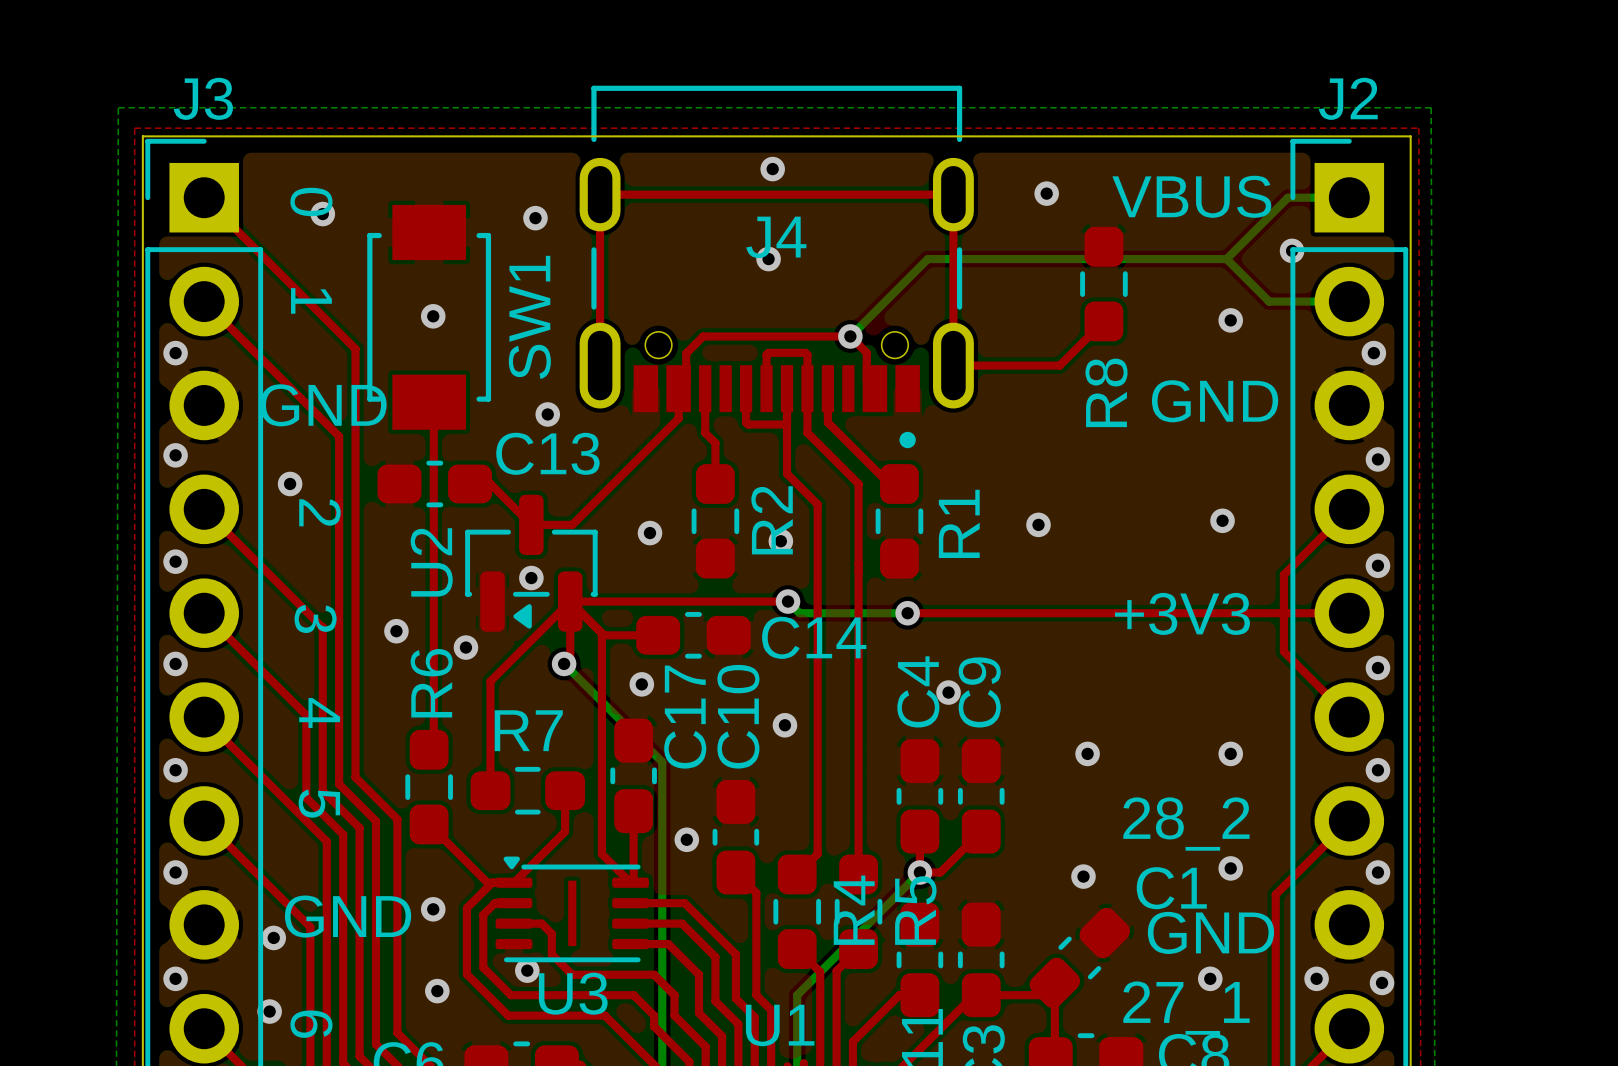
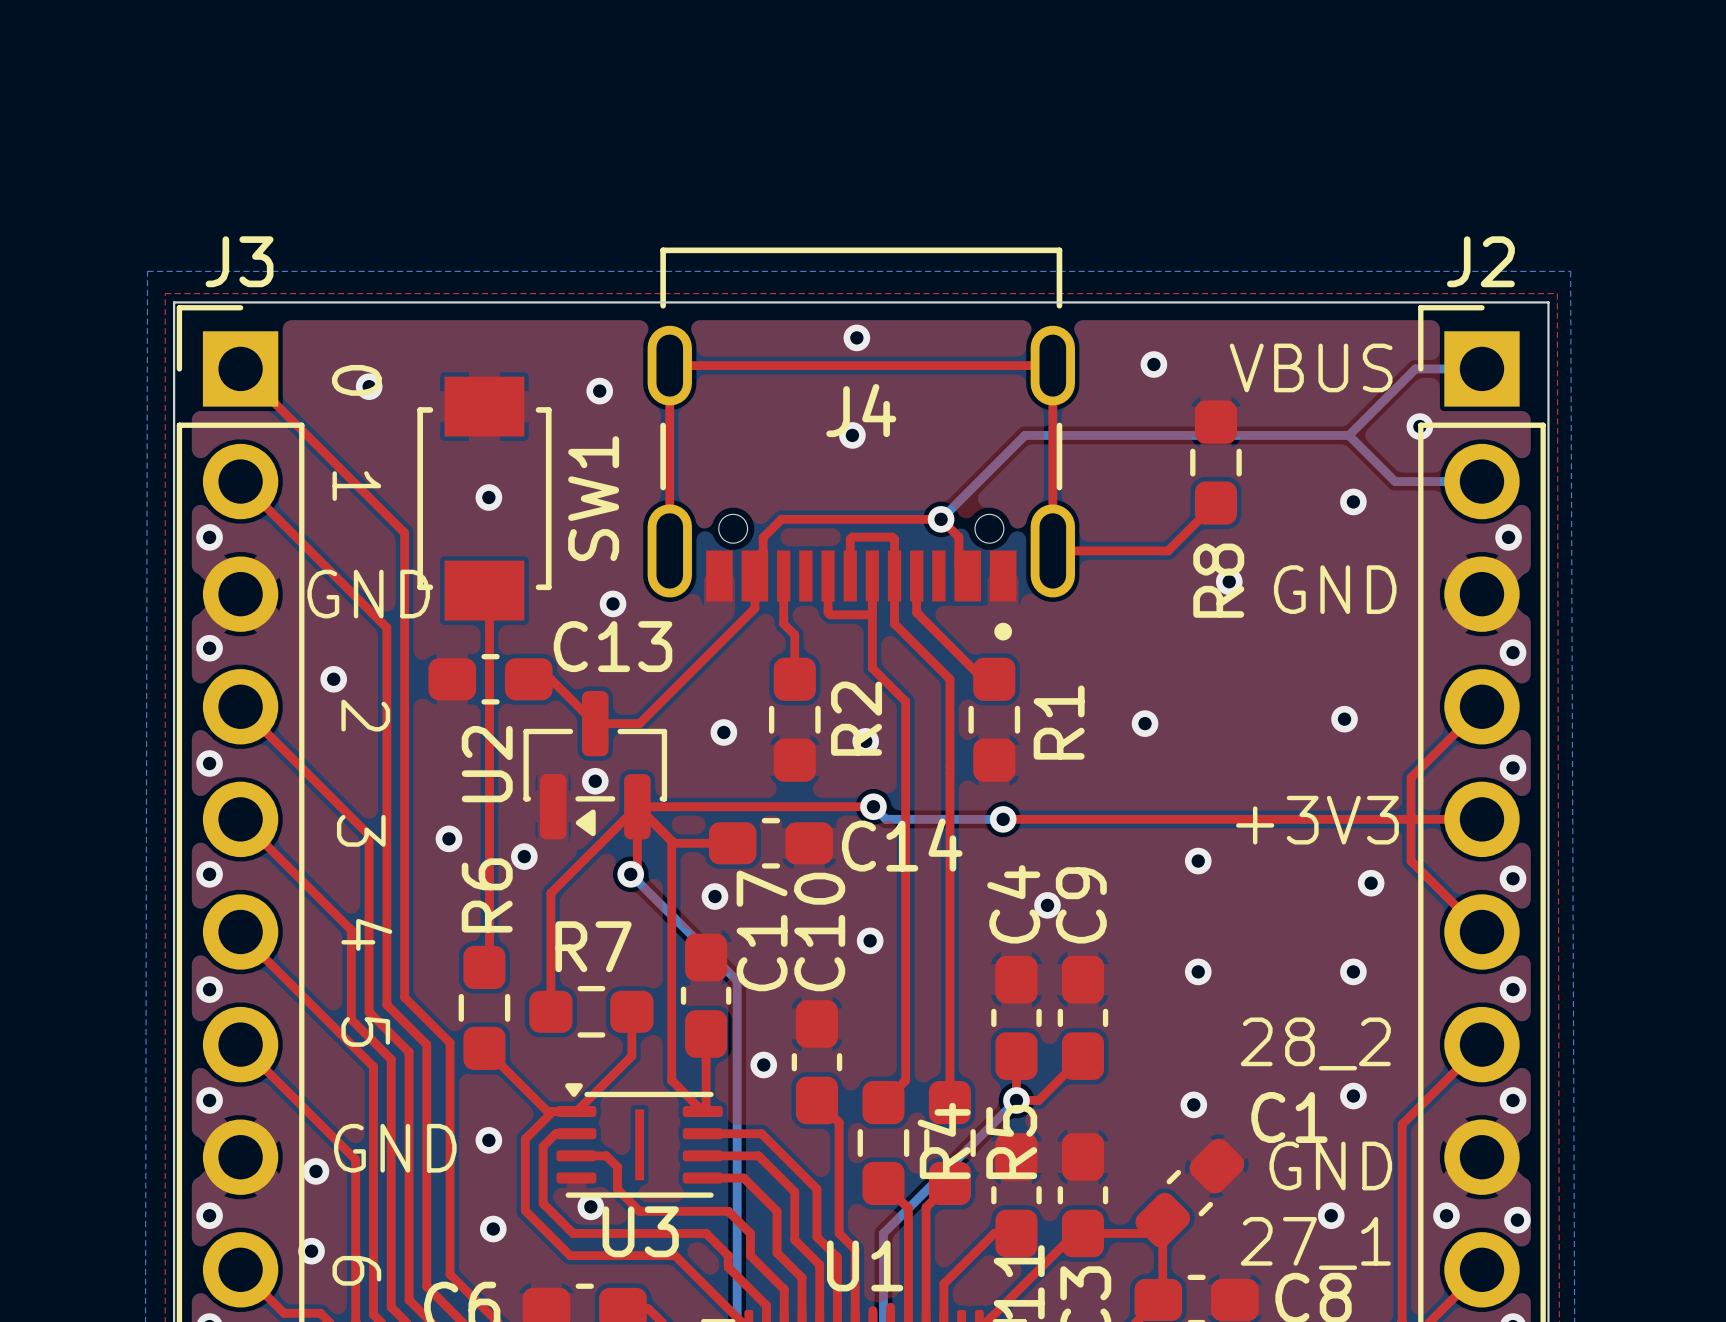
via: none -> (1229, 581)
via: none -> (1198, 861)
via: none -> (1371, 883)

